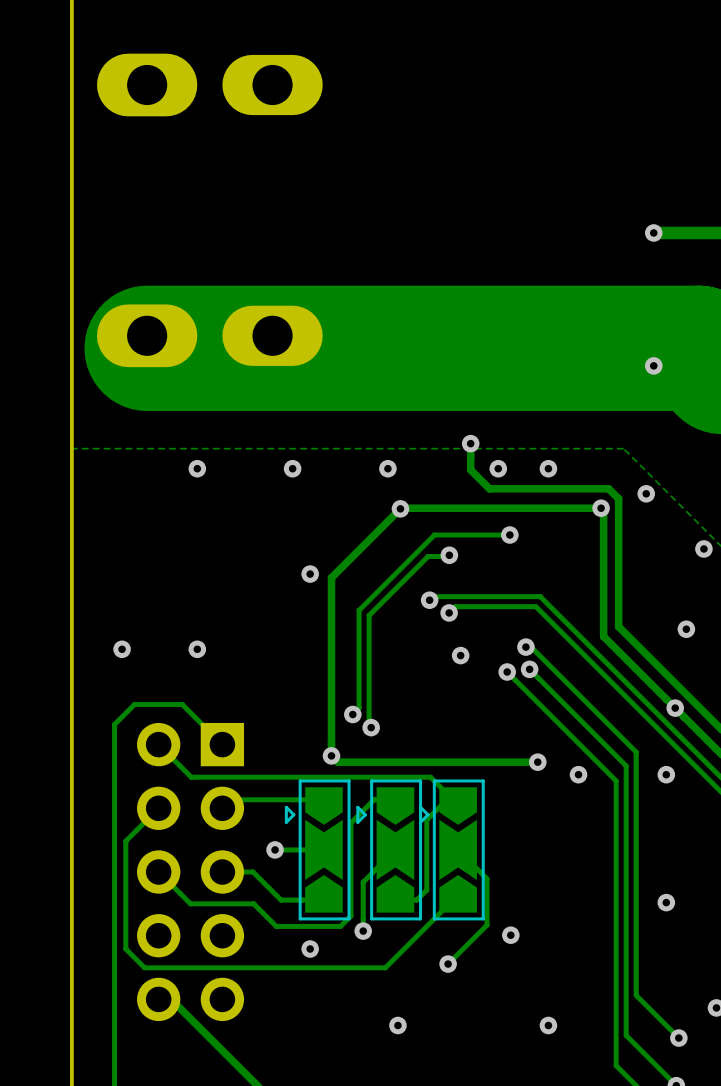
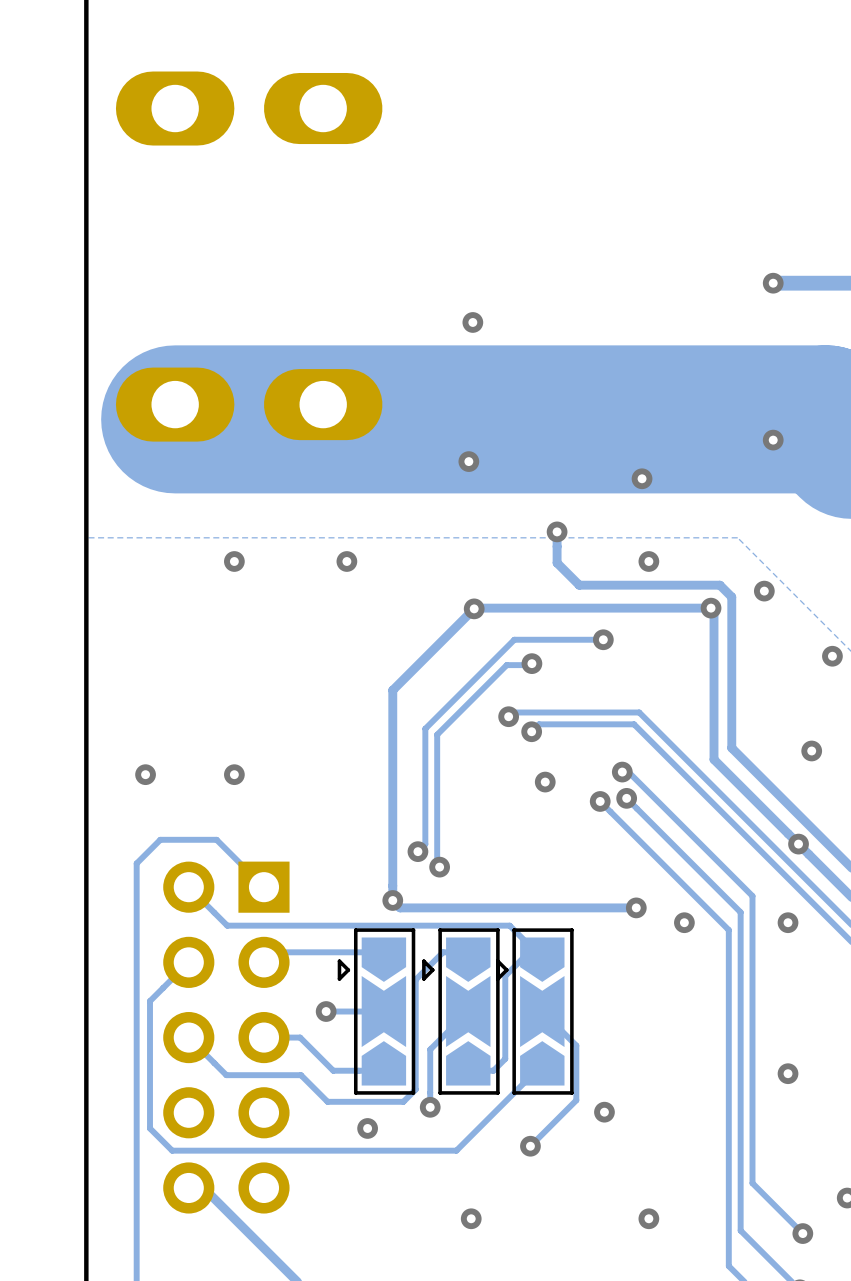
via: none -> (472, 322)
via: none -> (468, 461)
via: none -> (642, 478)
via: (387, 468) -> none
via: (498, 468) -> none
via: (310, 574) -> none

